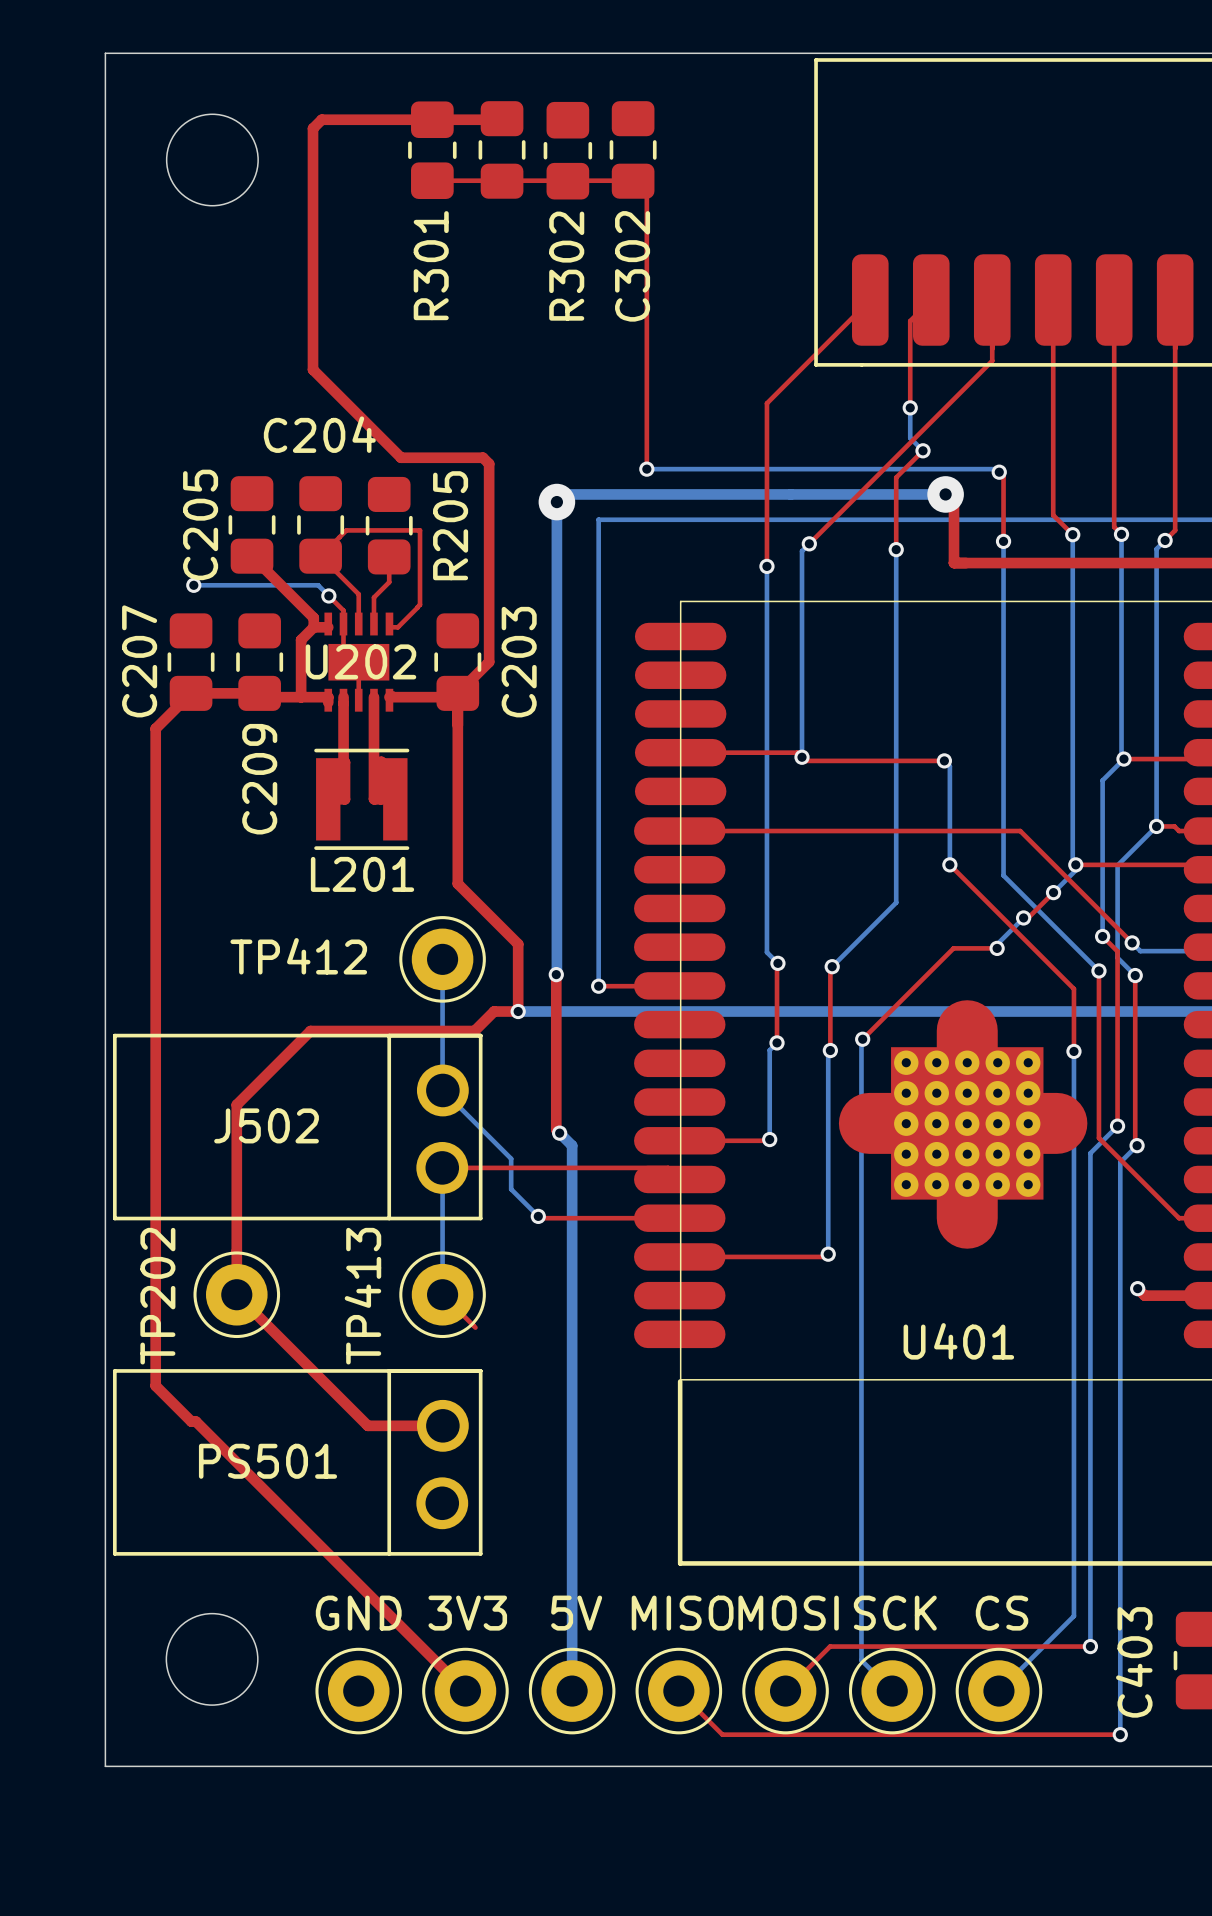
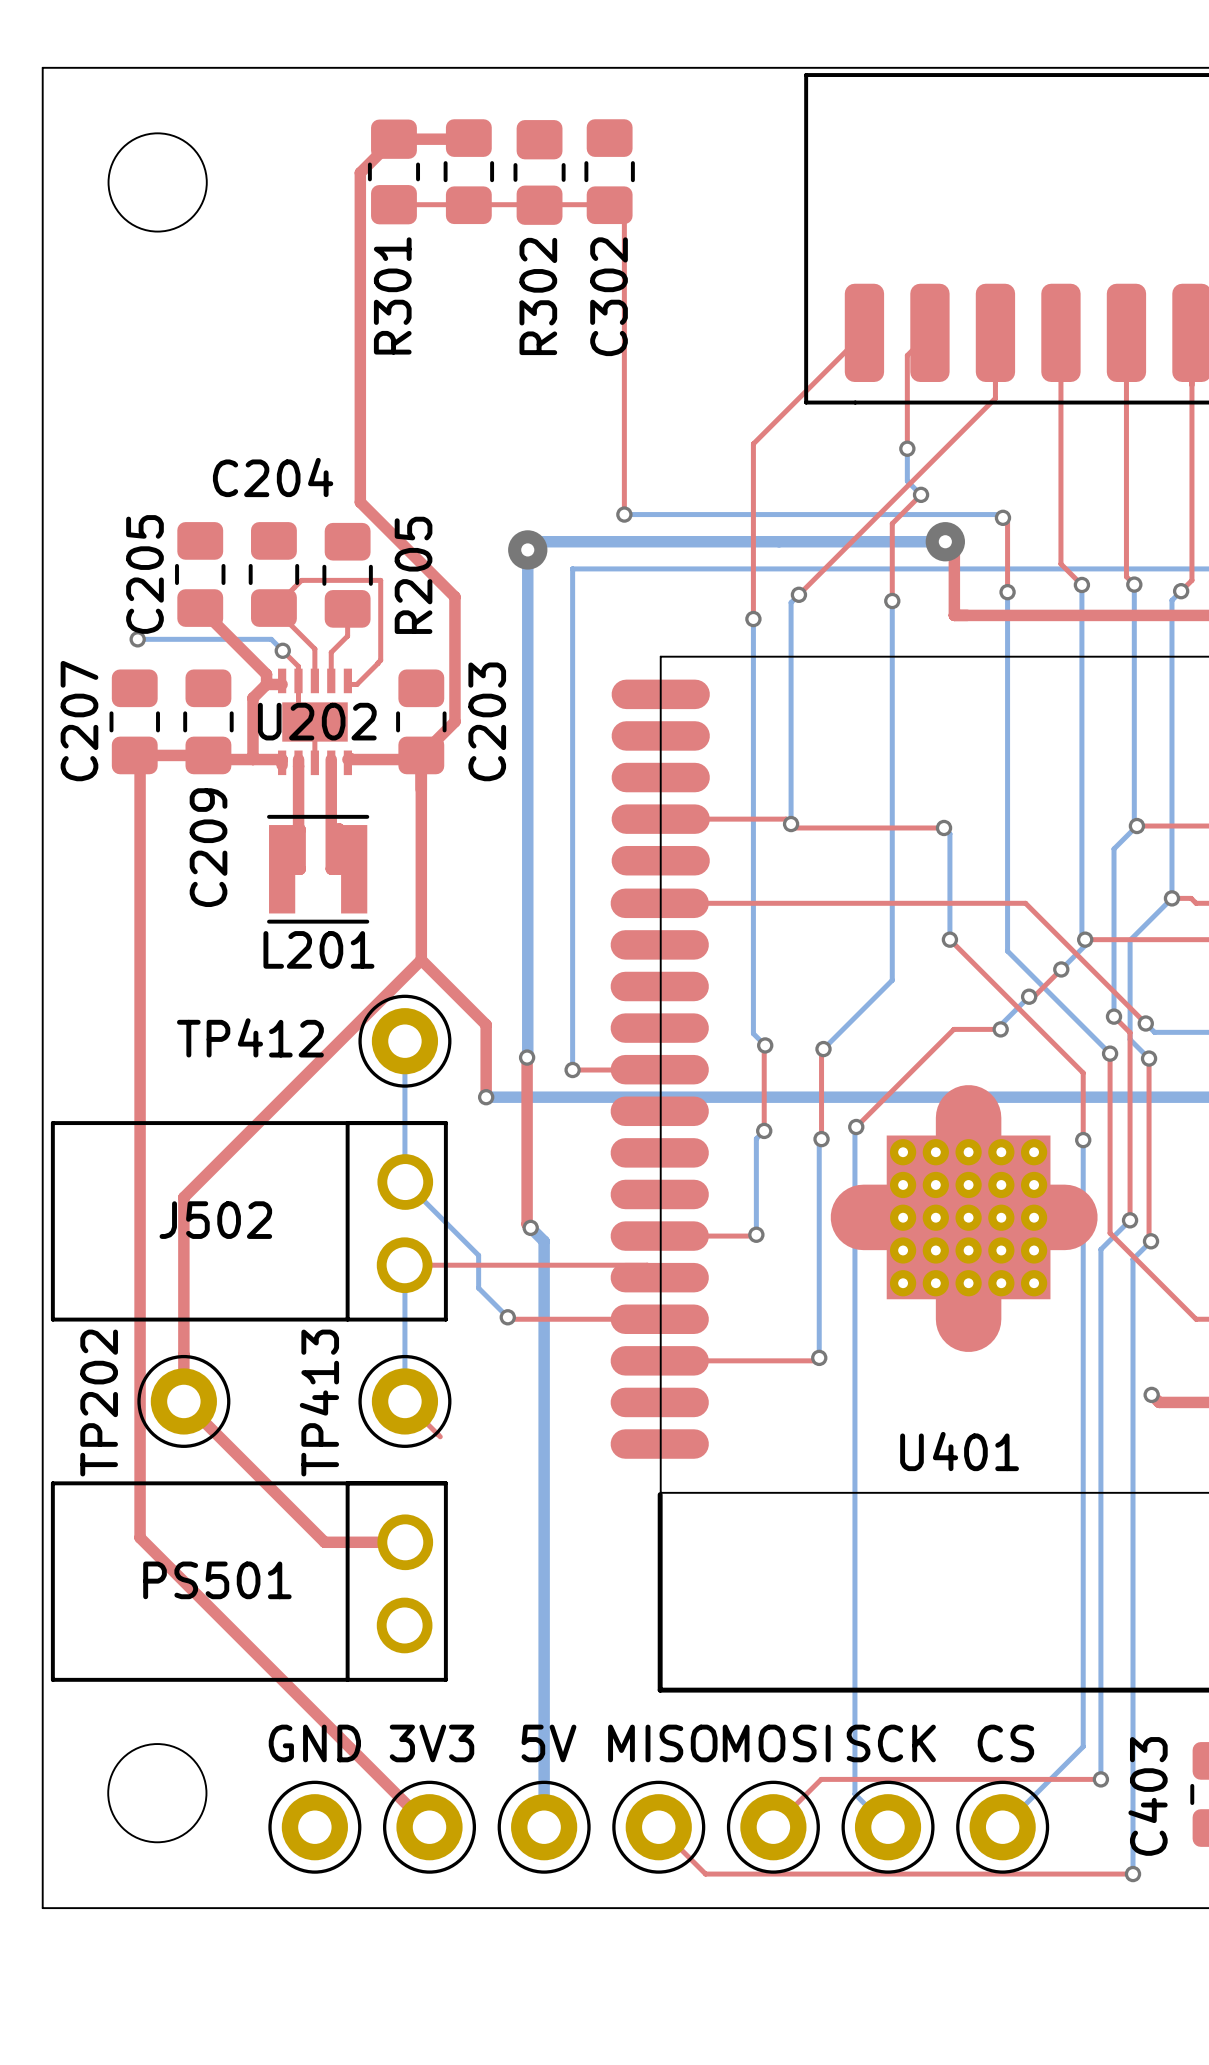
top track: (432, 119) (321, 119) (313, 128) (313, 369) (401, 457) (483, 457) (489, 463) (489, 545) -> (393, 139) (360, 172) (360, 502) (454, 596)
top track: (191, 693) (155, 728) (155, 1385) (191, 1421) (196, 1421) -> (140, 760) (140, 1537)
top track: (518, 1011) (494, 1011) (474, 1031) (310, 1031) -> (421, 959) (263, 1118)

